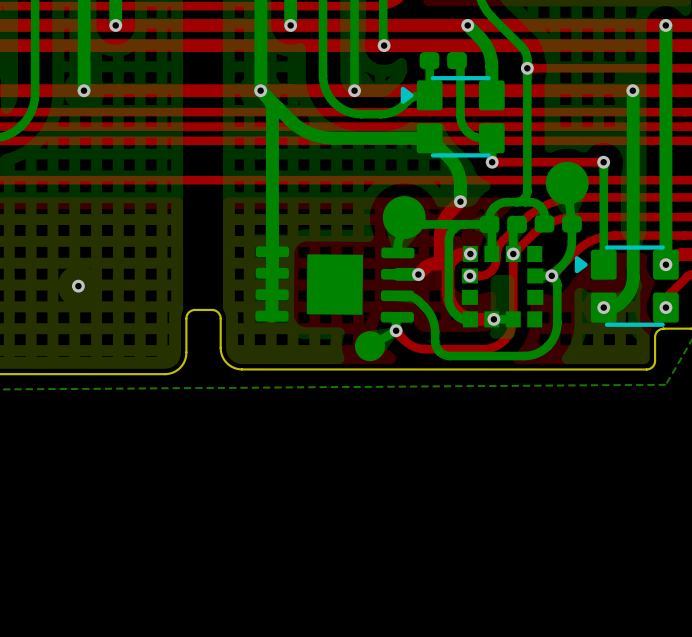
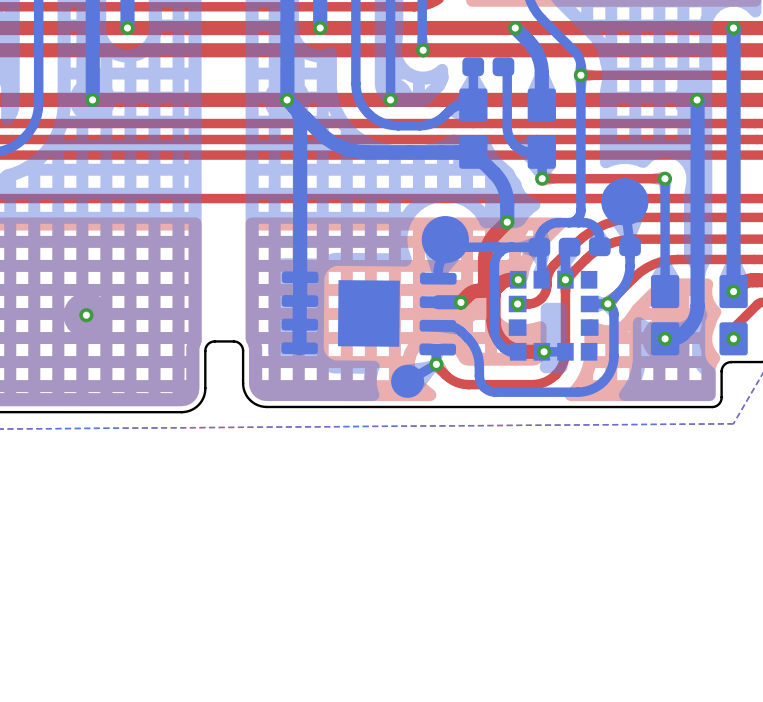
part footprint: [400, 76, 505, 158] -> [459, 88, 556, 169]
part footprint: [574, 245, 679, 327] -> [650, 275, 748, 356]

